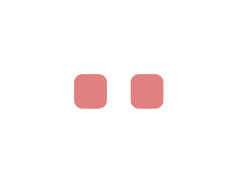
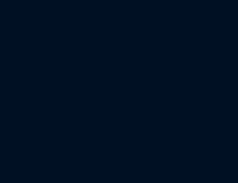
part: (118, 91) -> none

